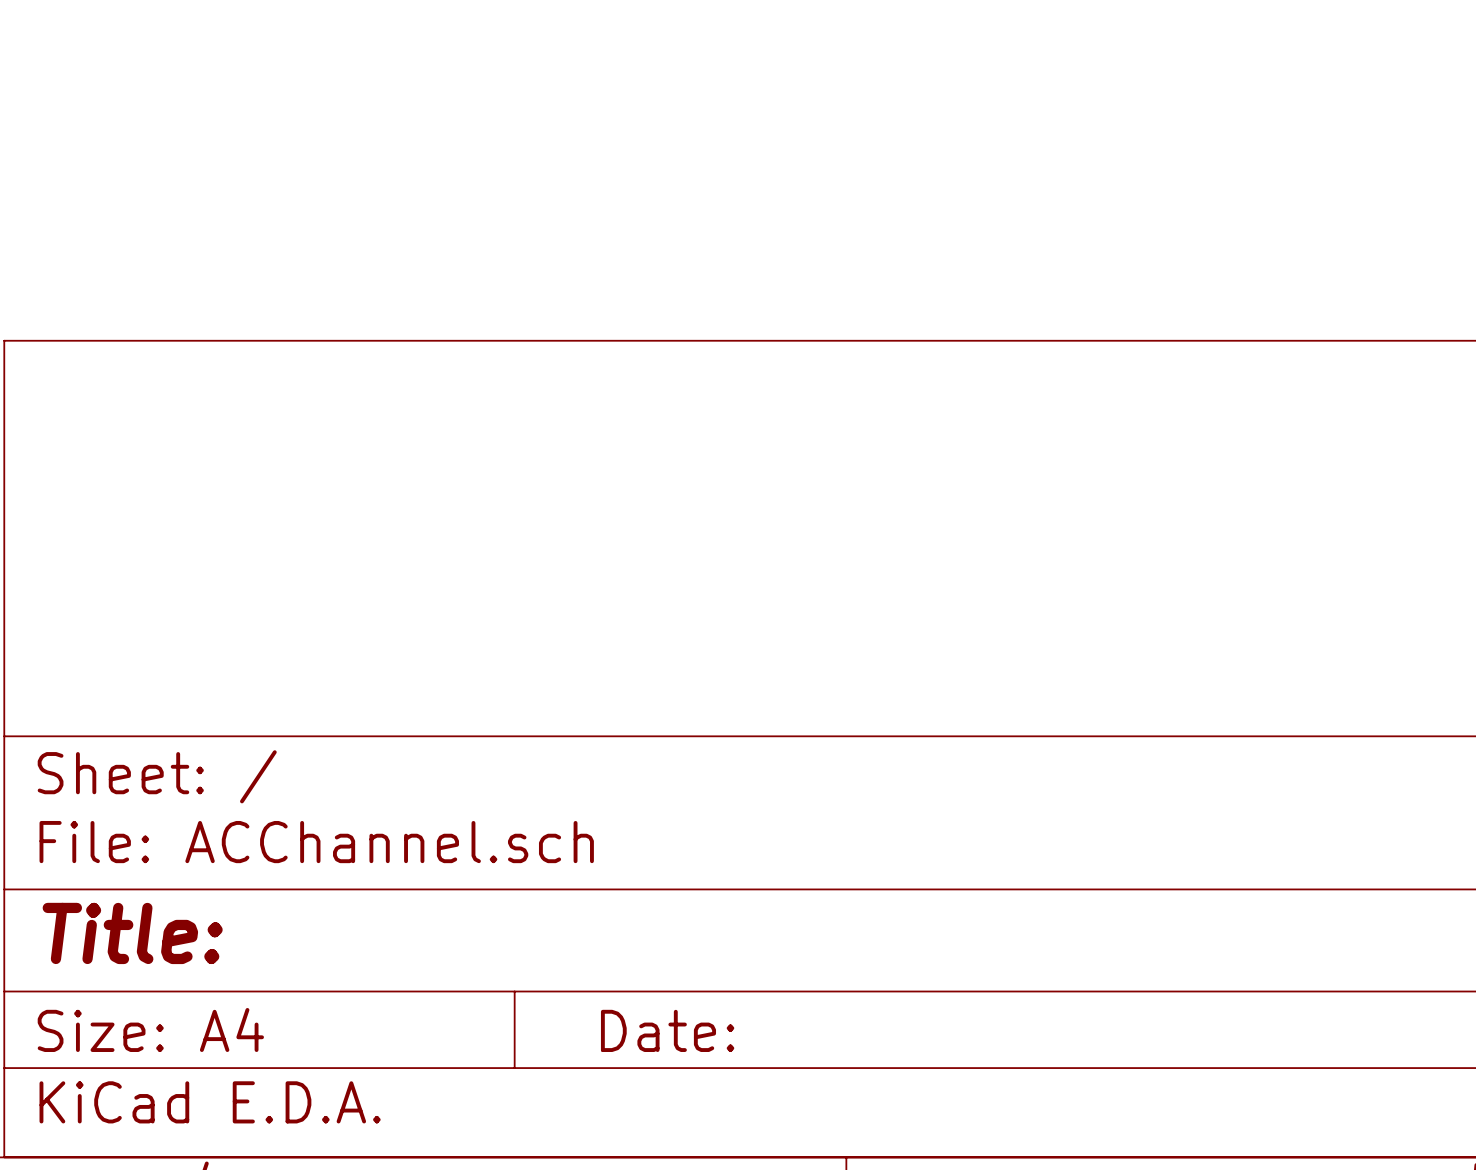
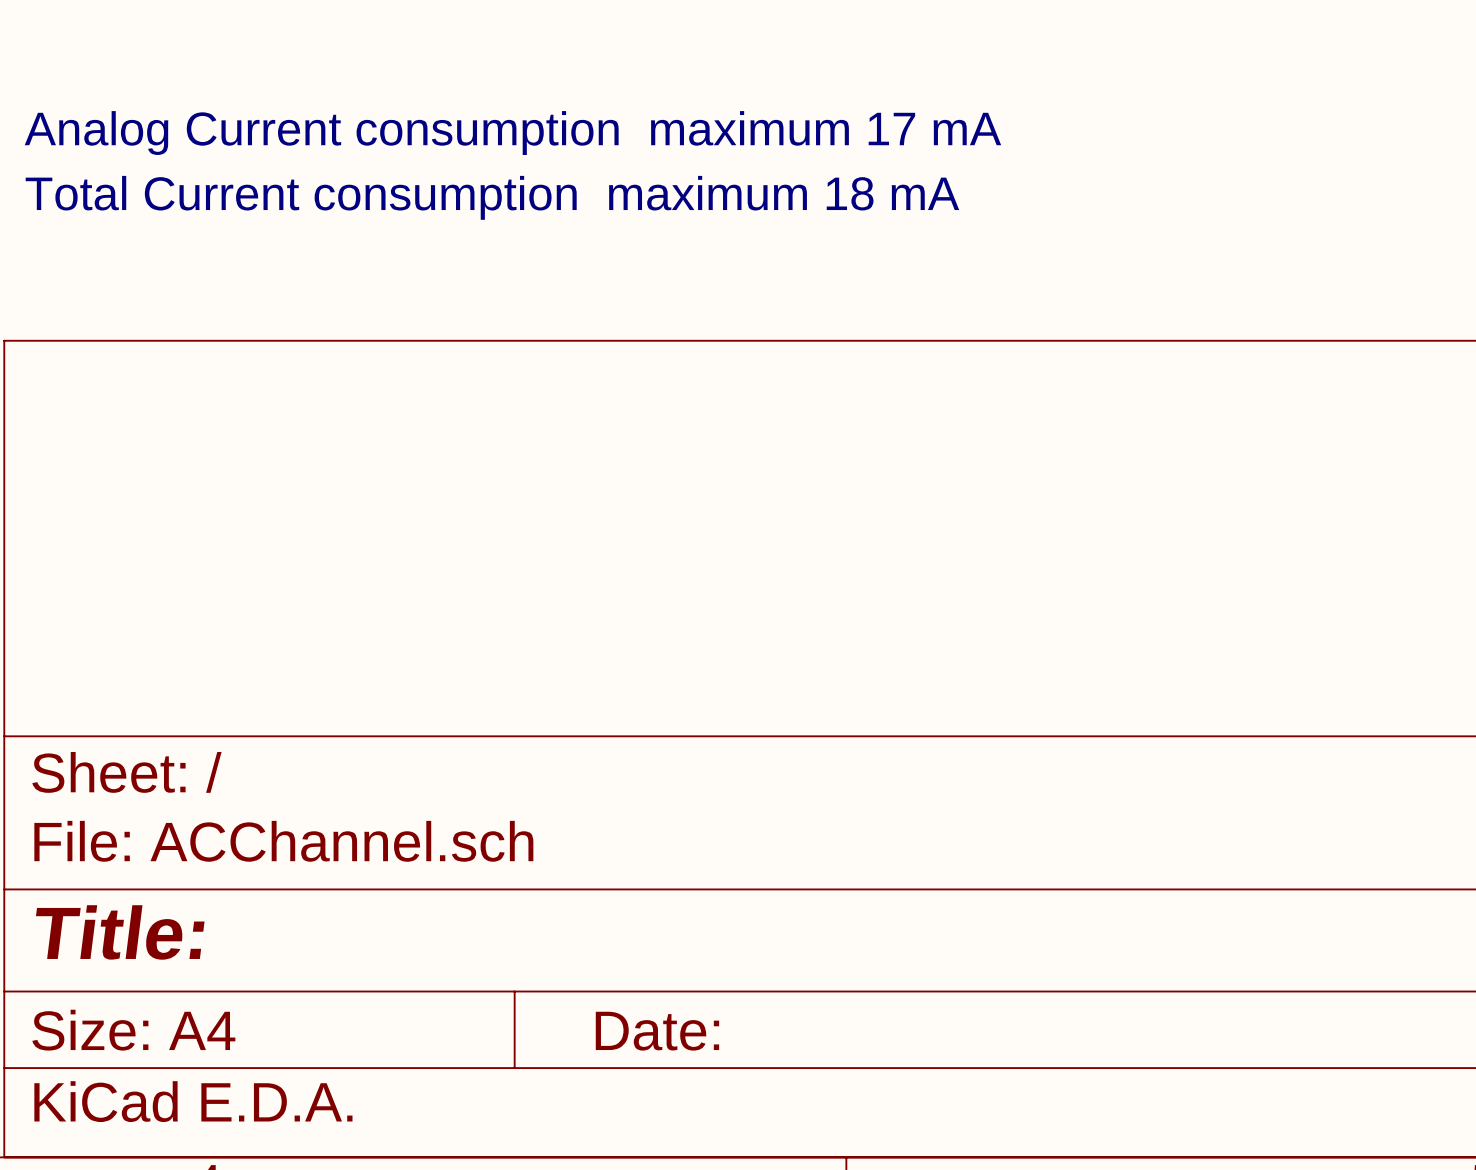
text: none -> Analog Current consumption maximum 17 mA (512, 133)
text: none -> Total Current consumption maximum 18 mA (492, 197)

